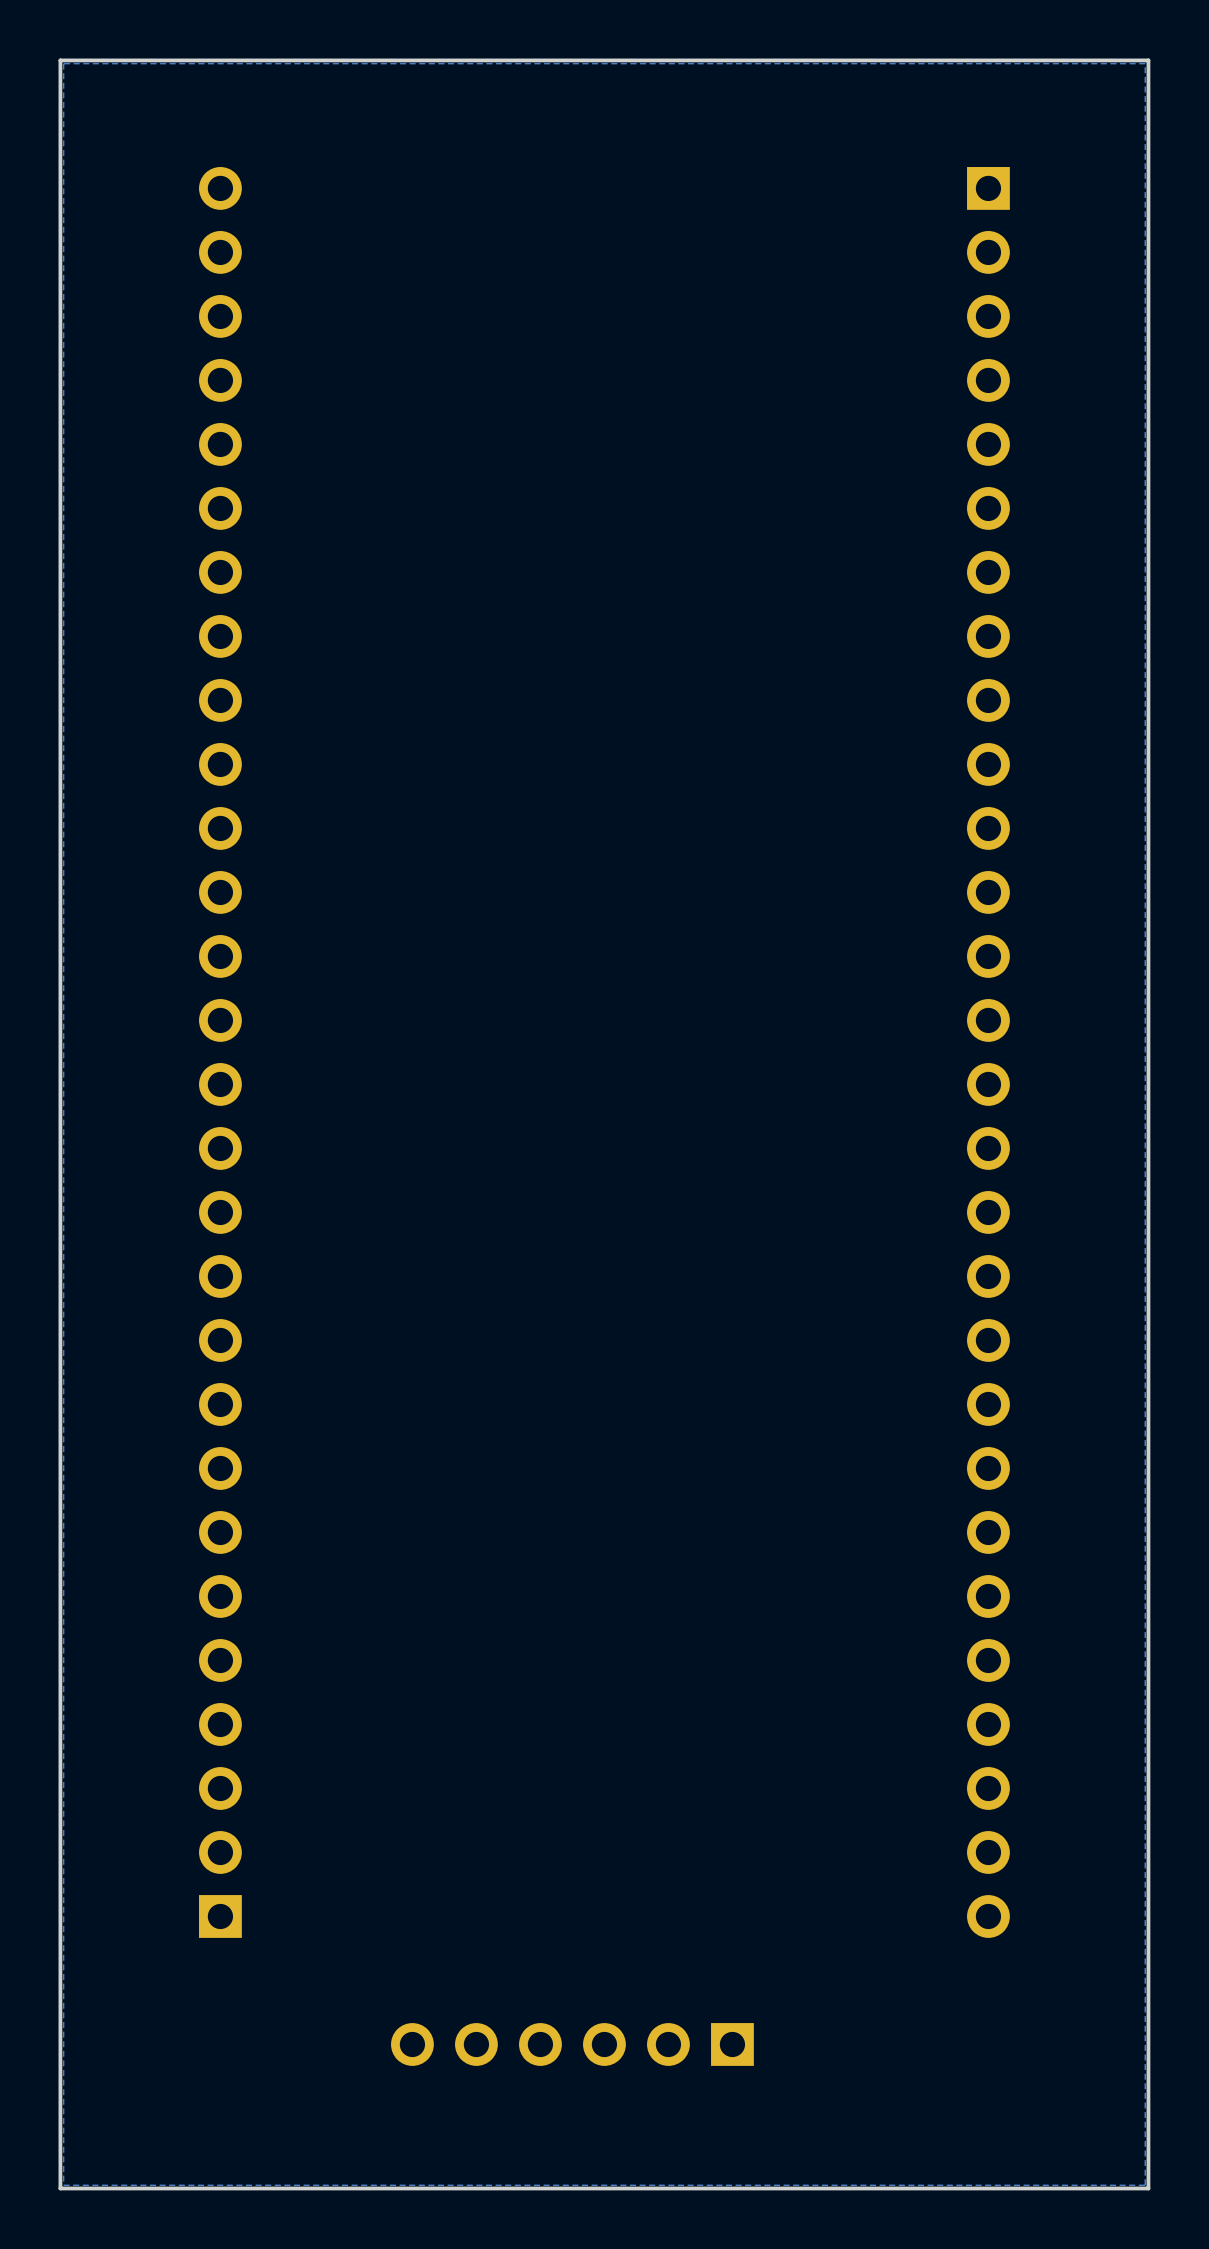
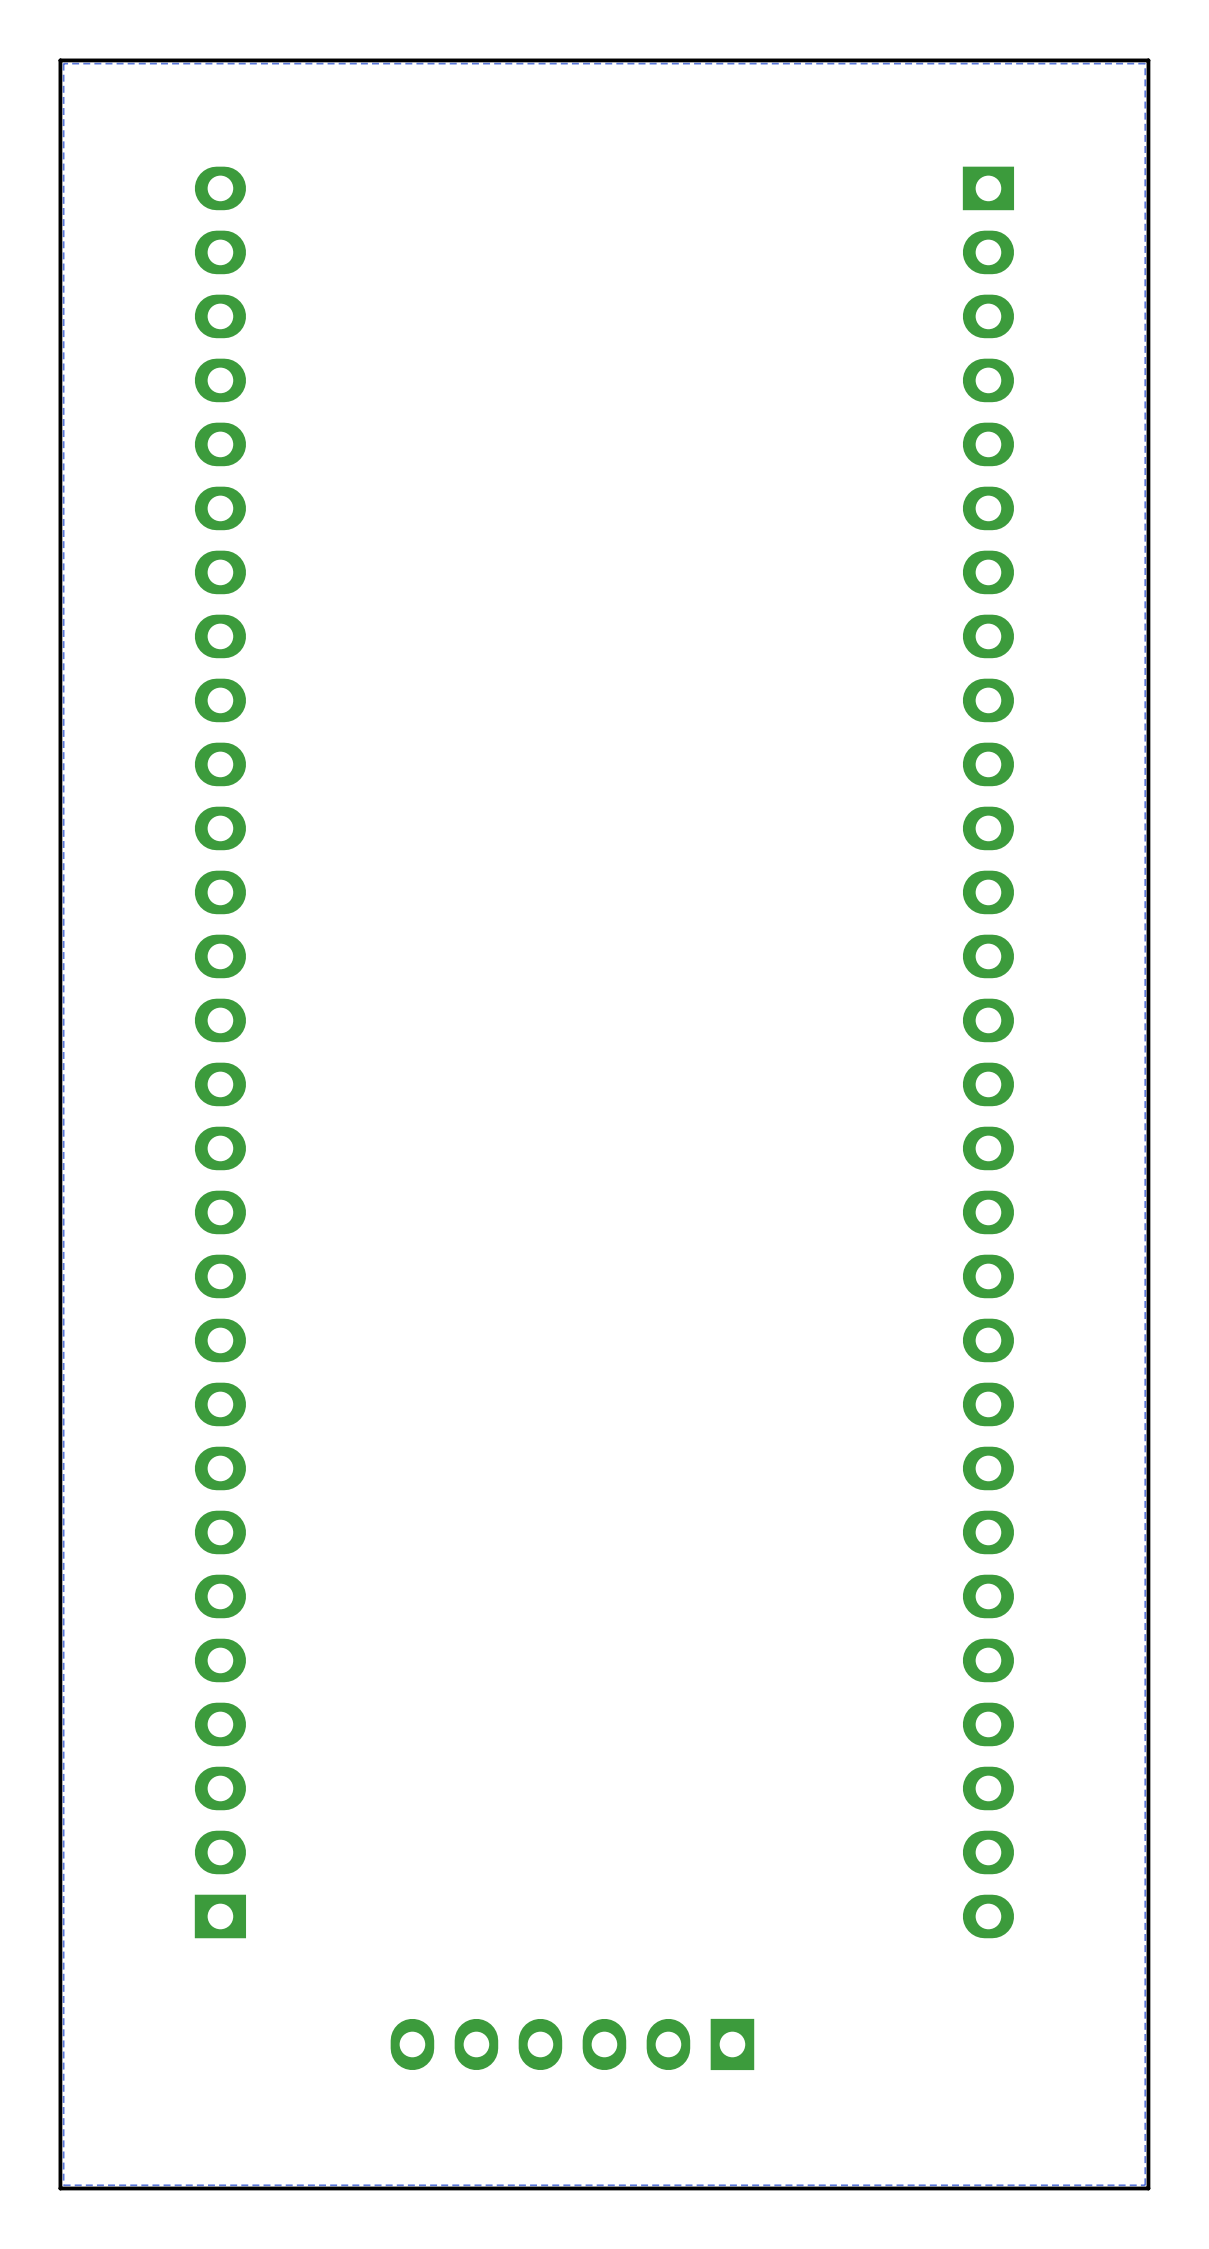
part footprint: [199, 167, 242, 1938] -> [194, 166, 247, 1939]
part footprint: [967, 167, 1010, 1938] -> [962, 166, 1015, 1939]
part footprint: [391, 2023, 754, 2066] -> [390, 2018, 755, 2071]

